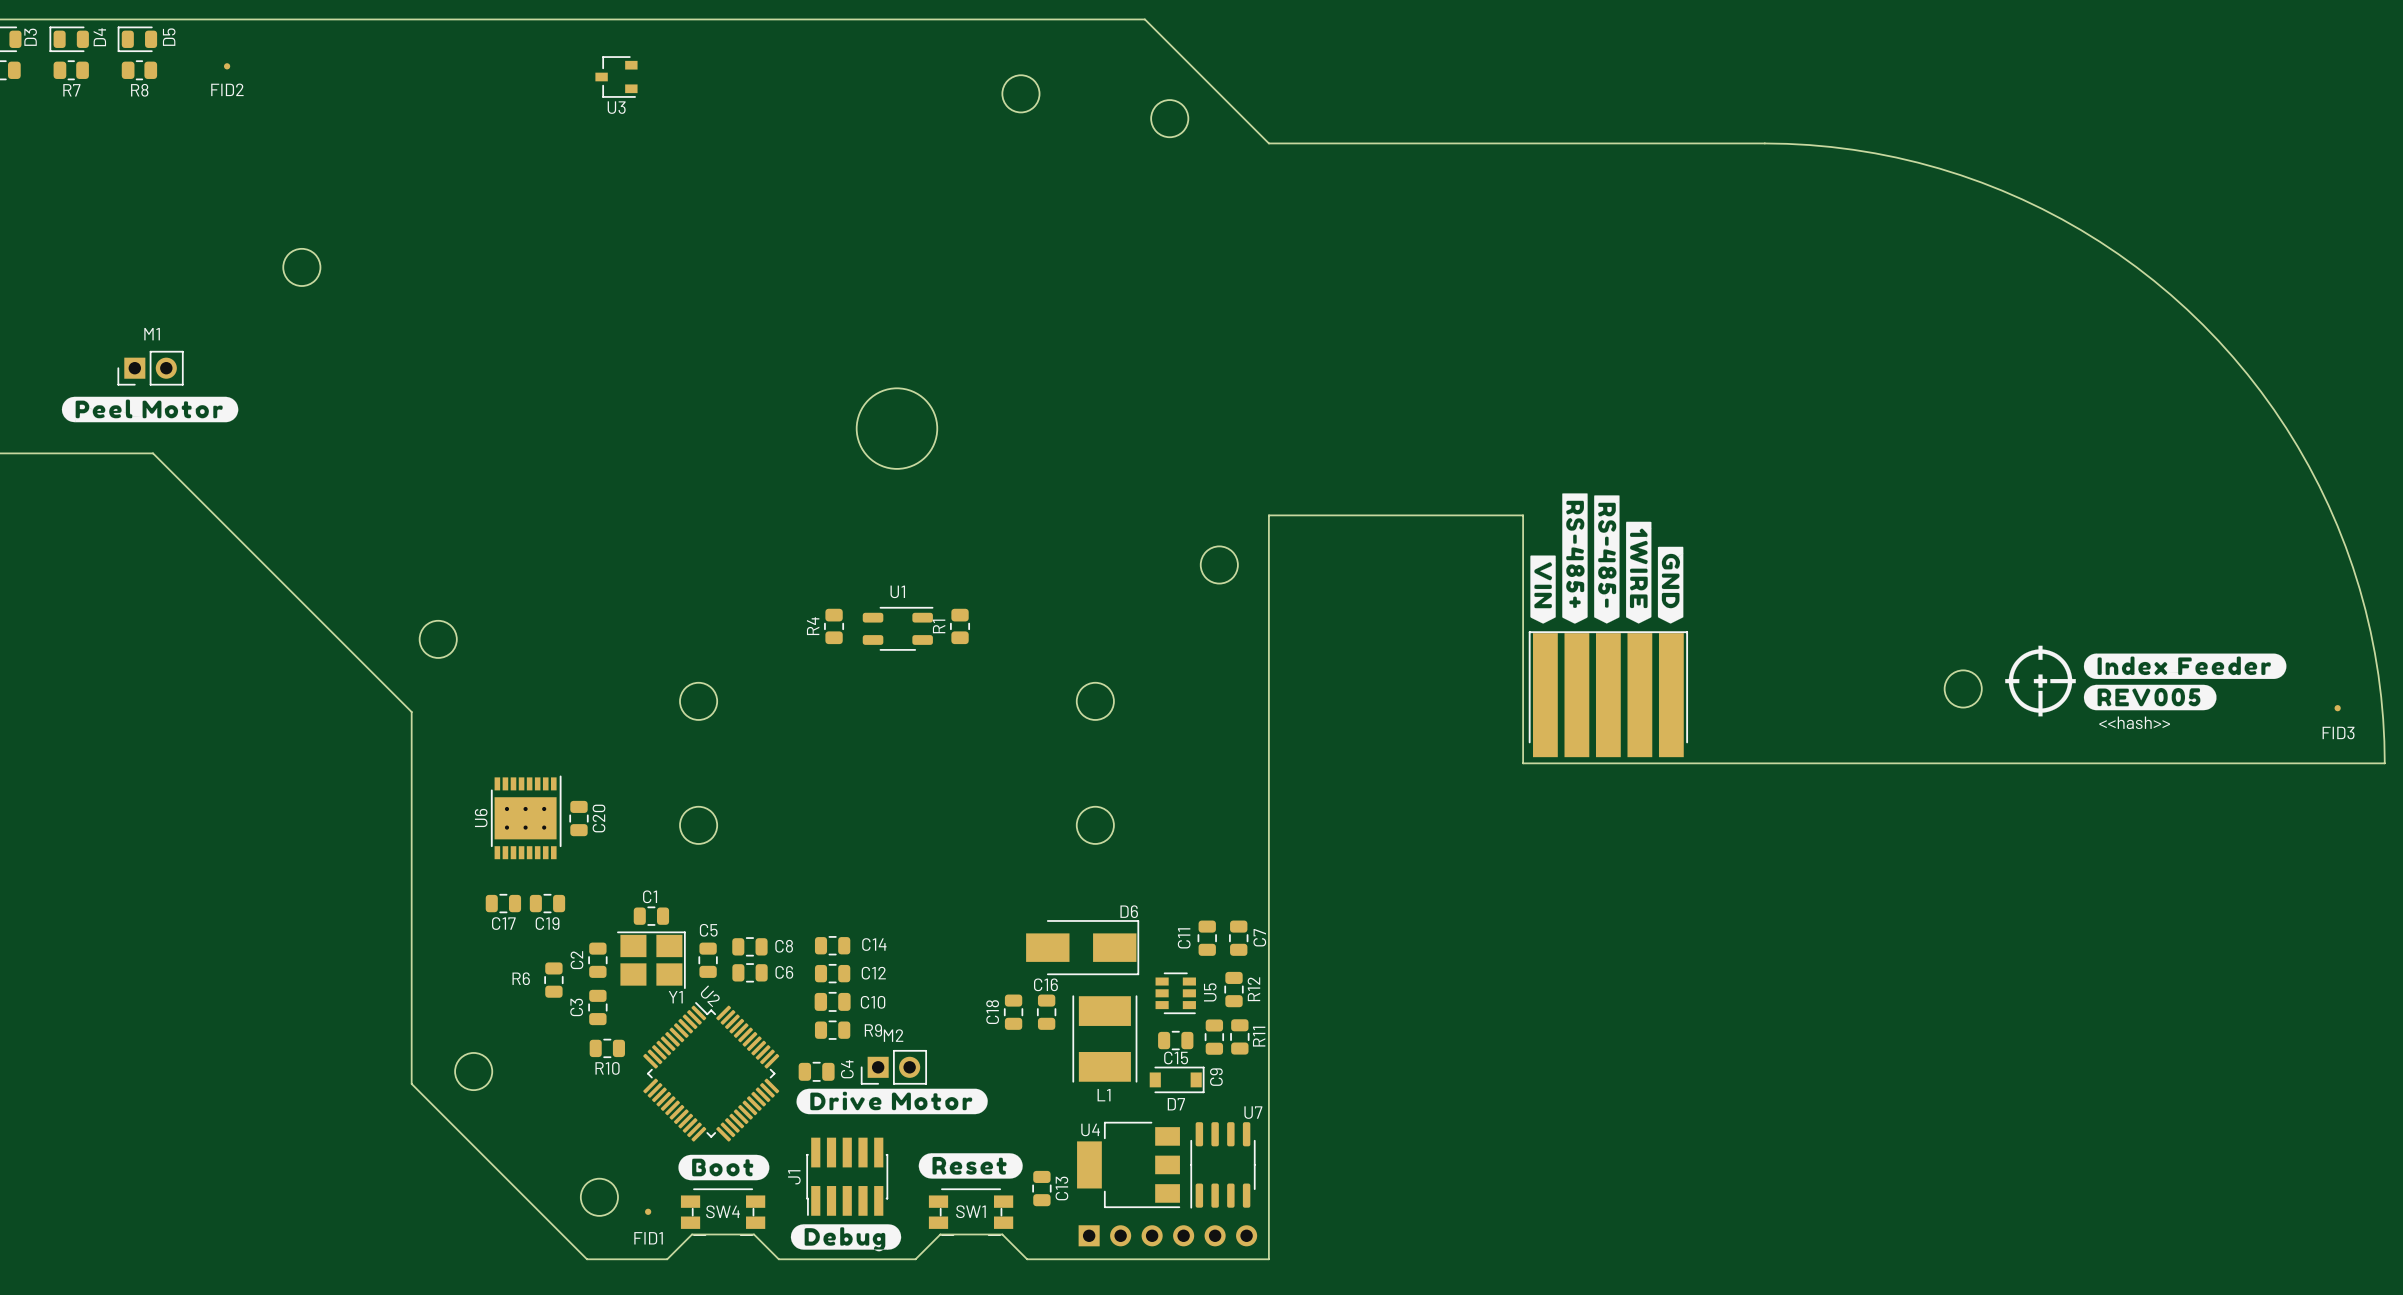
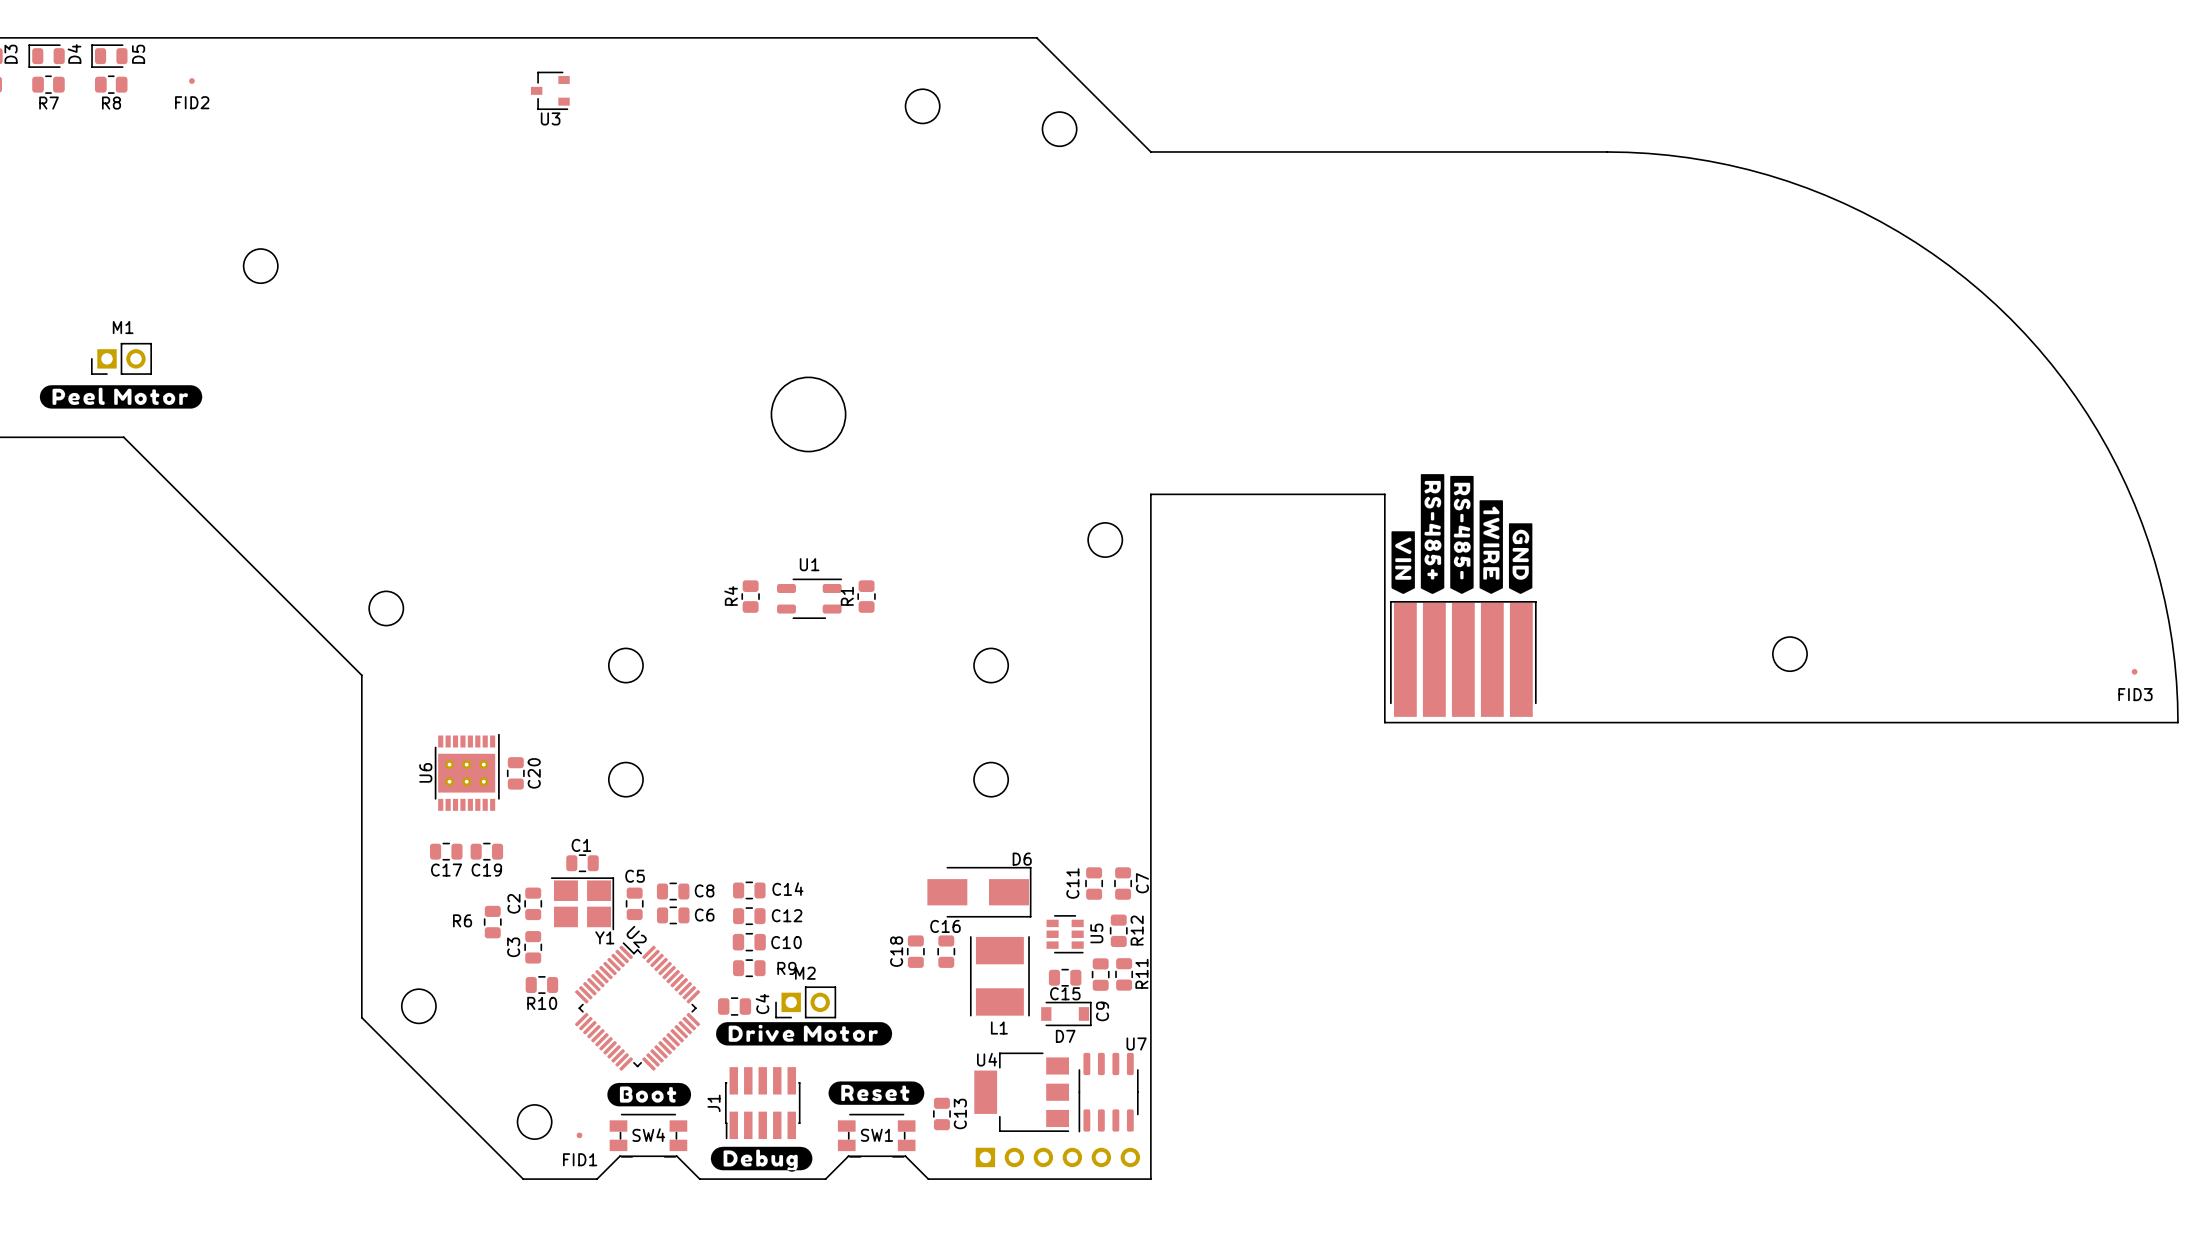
drawing: [2005, 645, 2287, 717] -> none
text: <<hash>> (2134, 722) -> none

